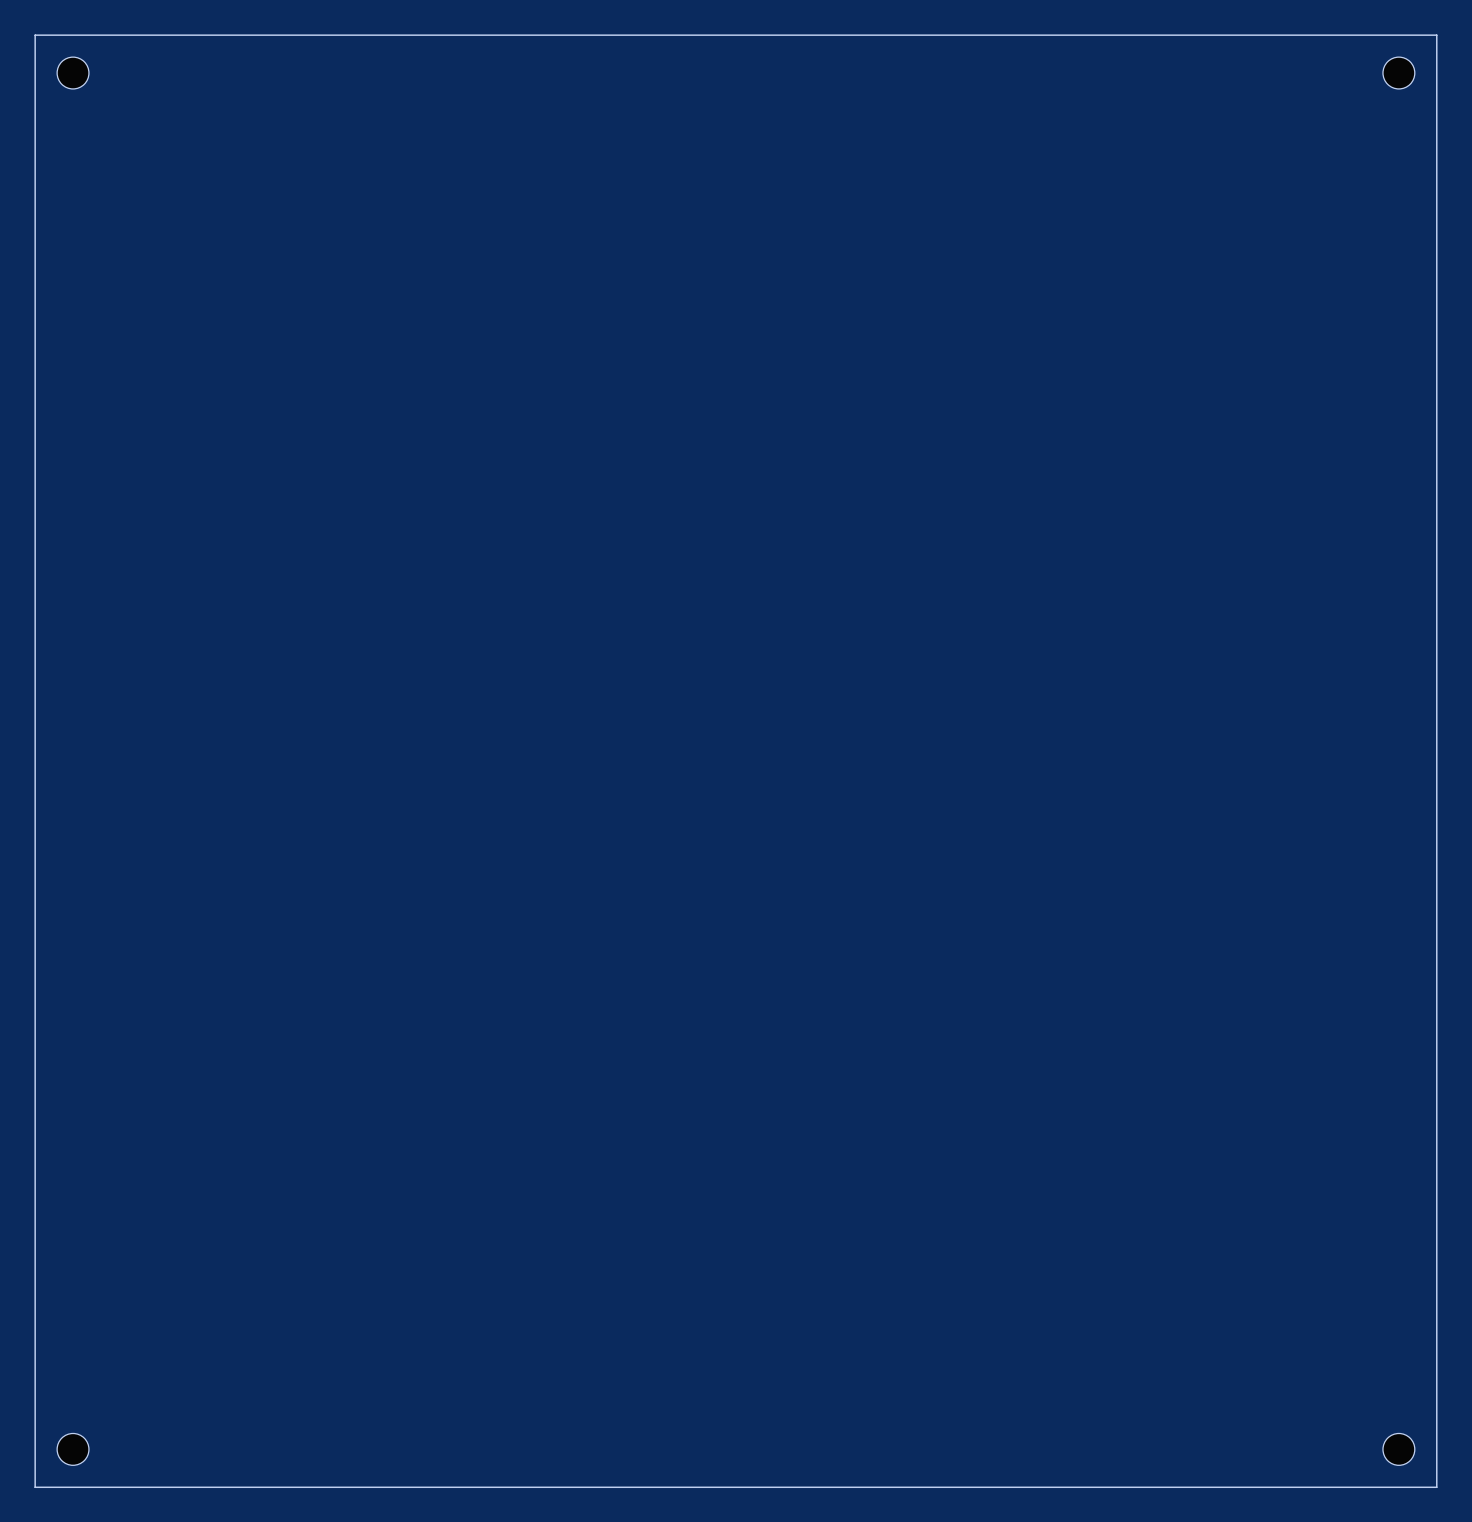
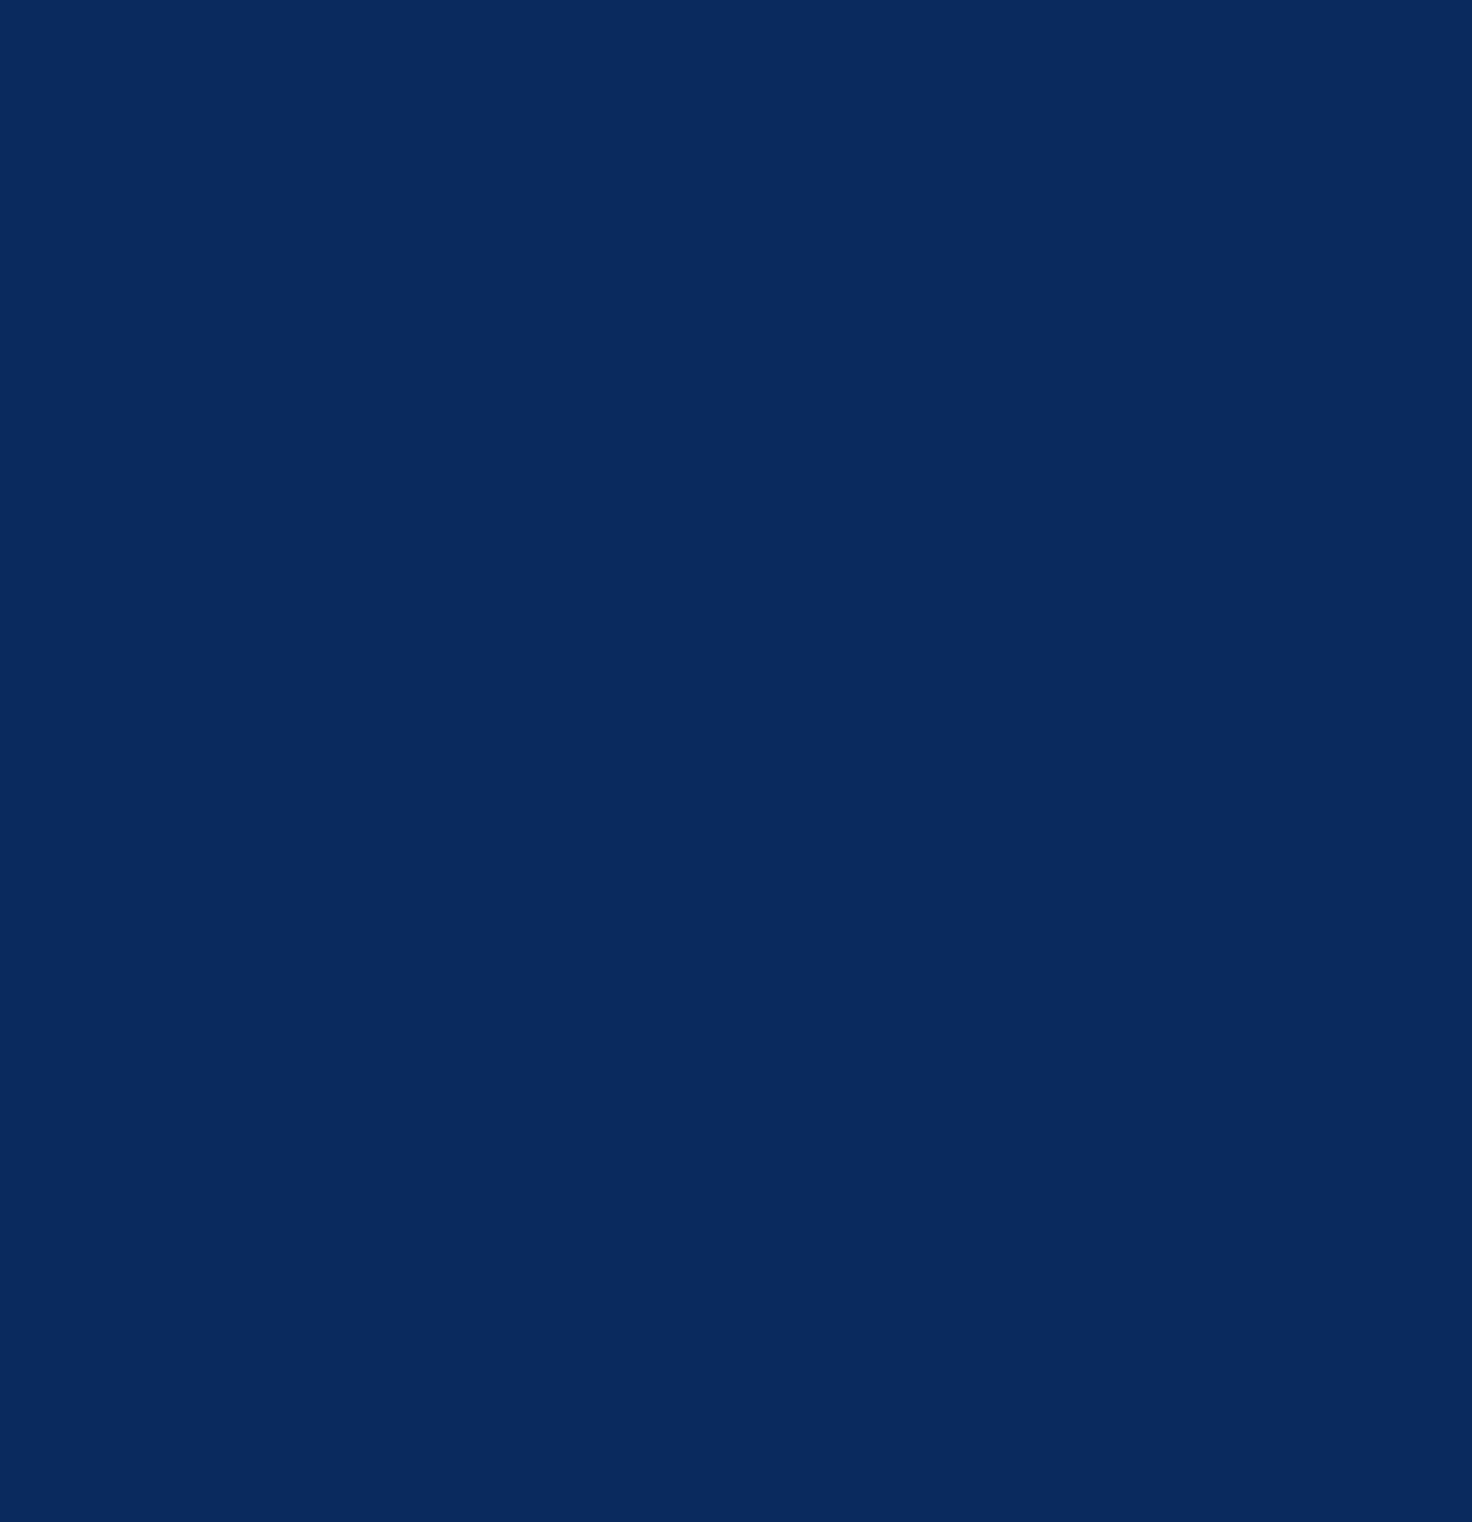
board edge: (1436, 35) (1436, 1487) (35, 1487) (35, 35) (1436, 35) -> none
part: (73, 73) -> none
part: (1398, 73) -> none
part: (73, 1449) -> none
part: (1398, 1449) -> none

